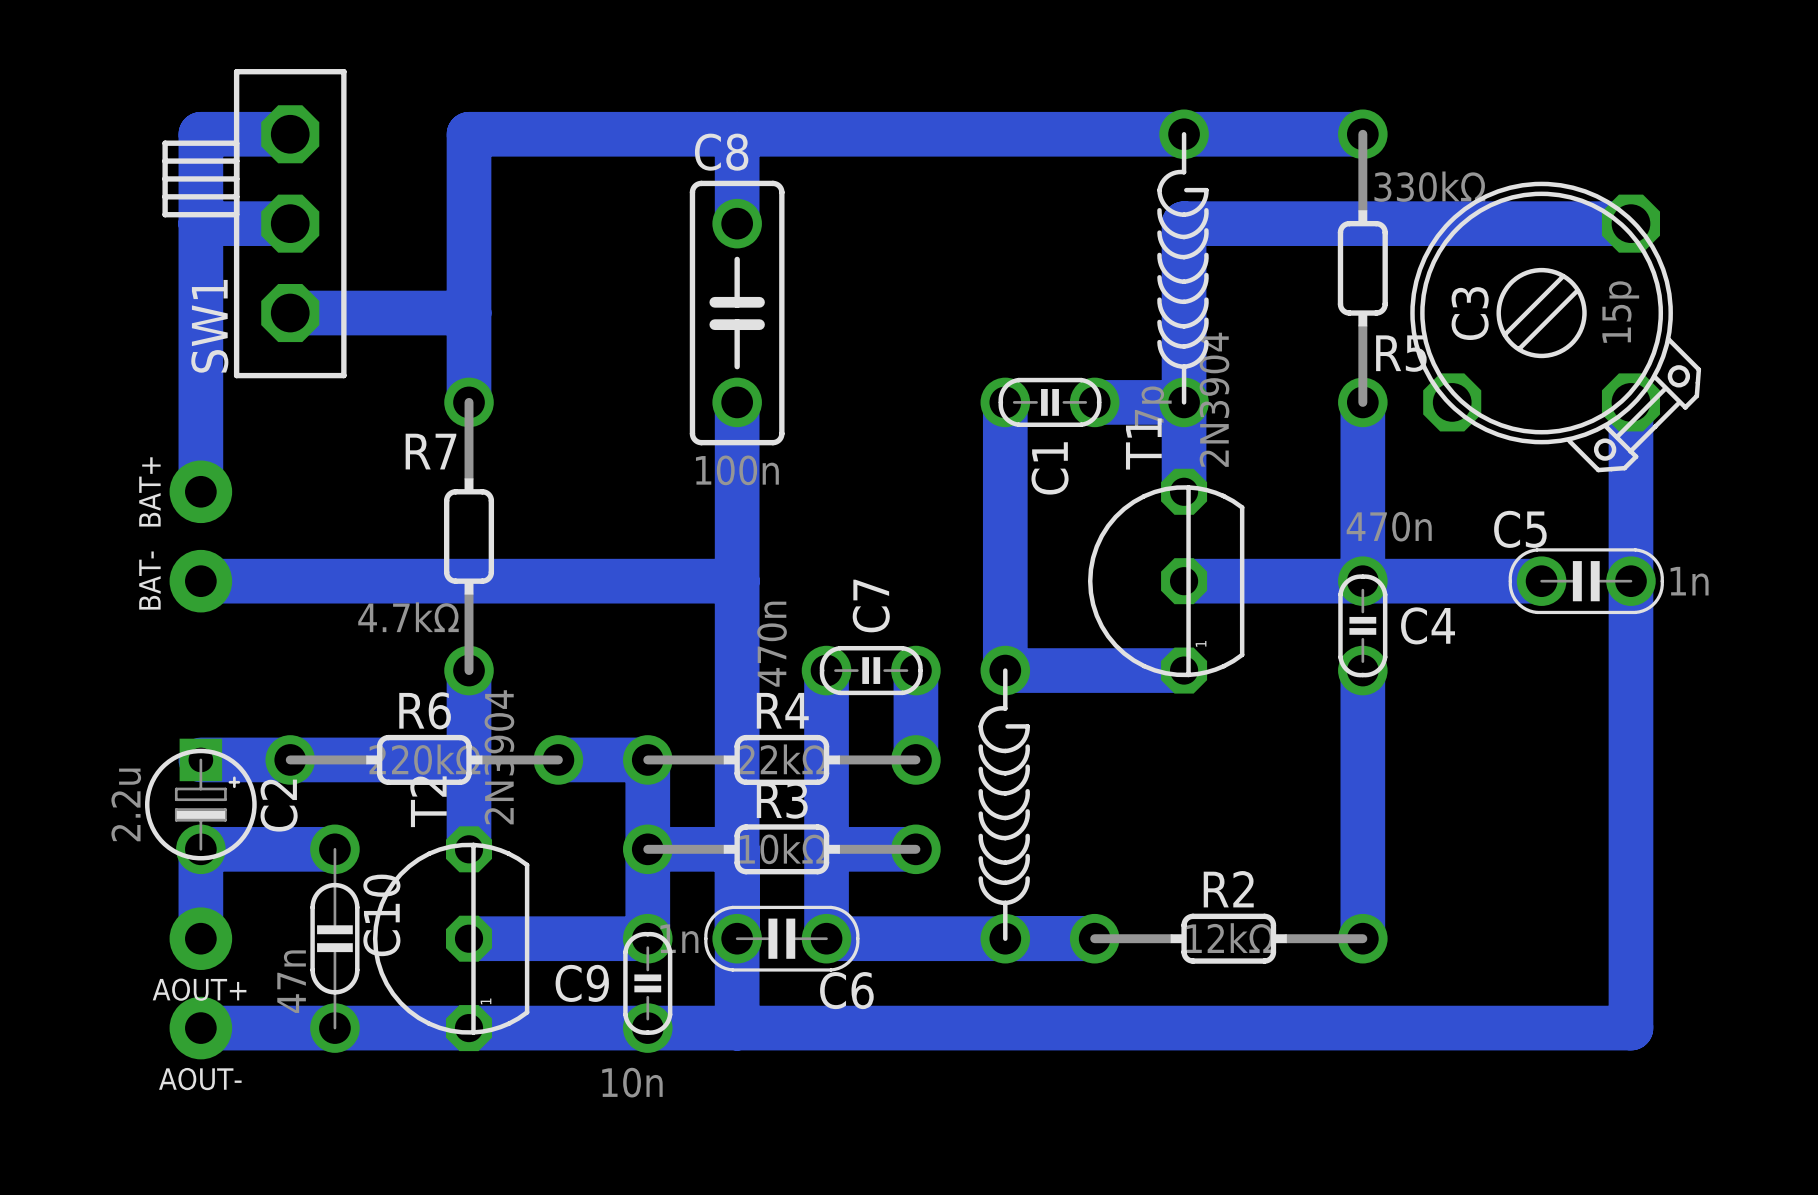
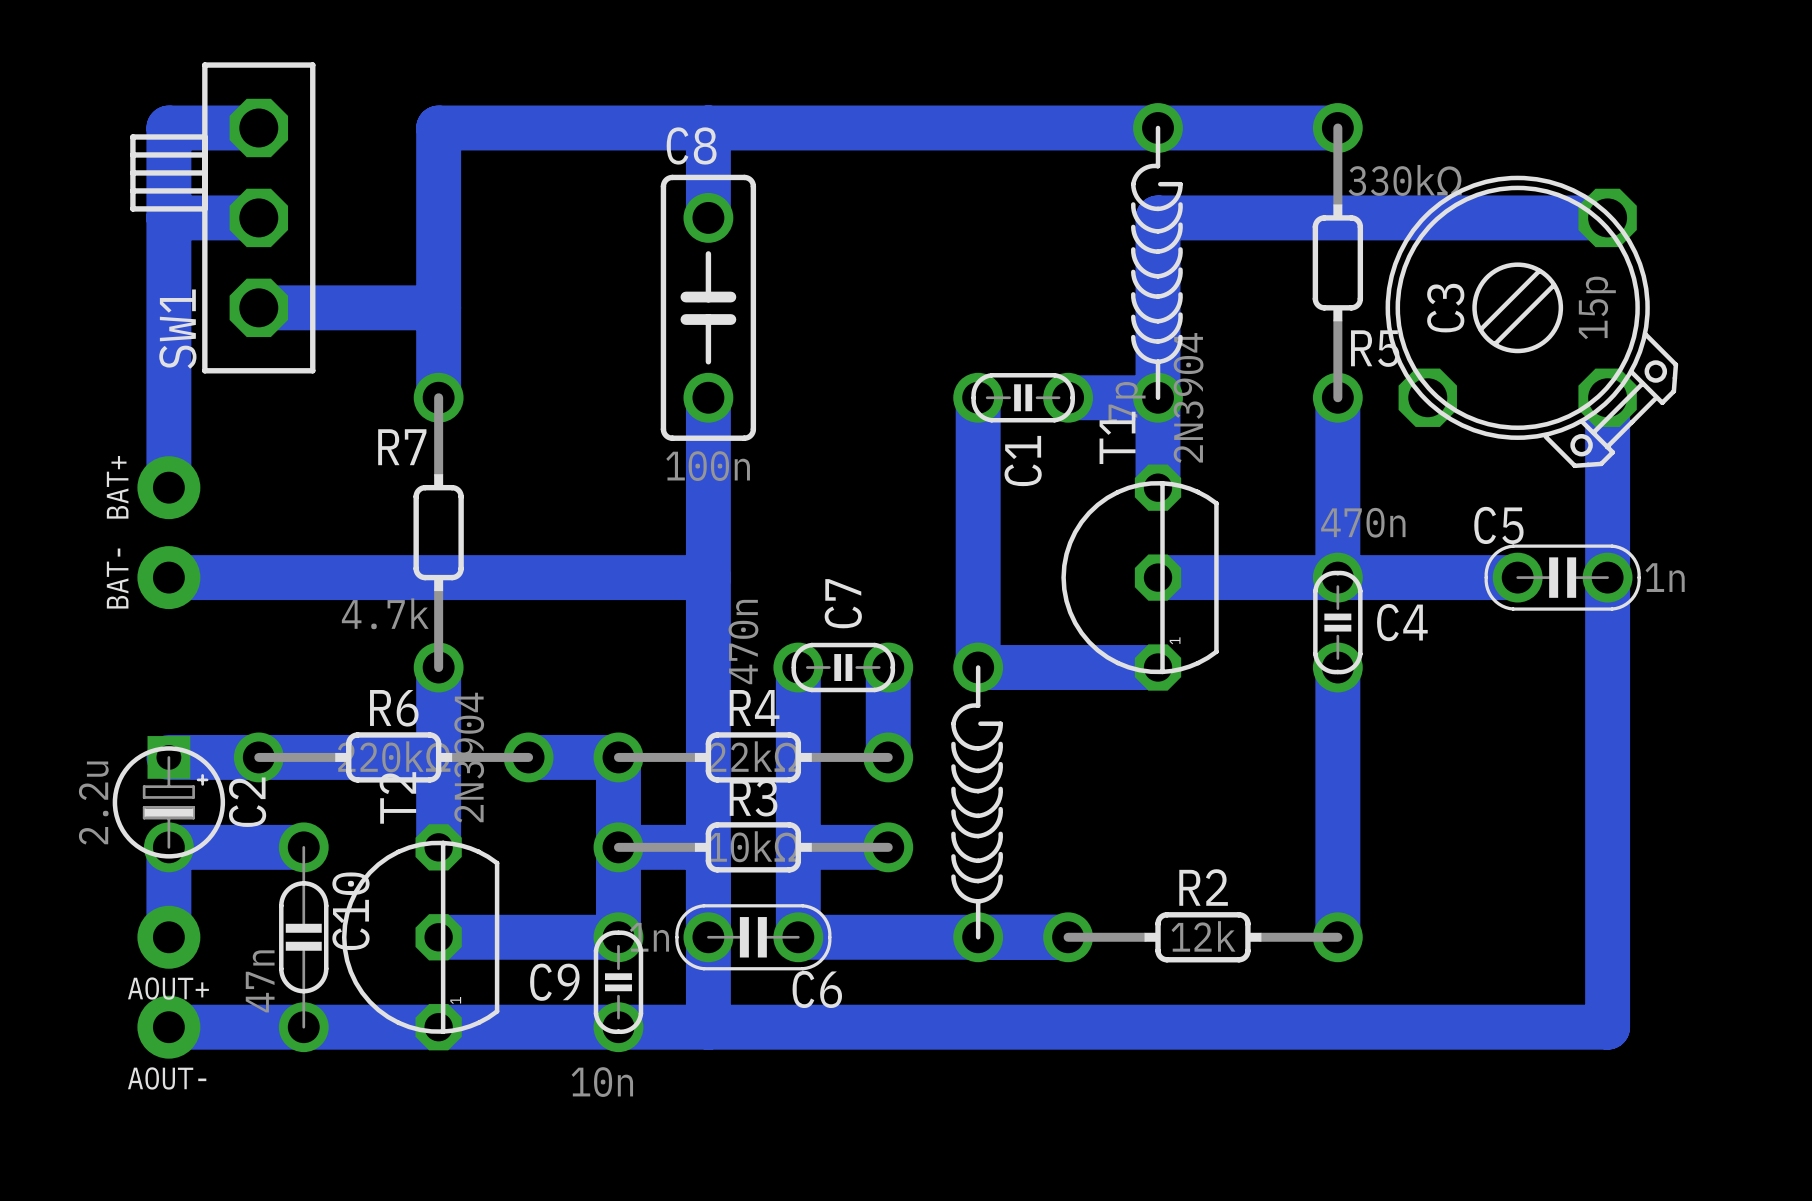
R7 value: 4.7kΩ (408, 617) -> 4.7k (385, 613)
R2 value: 12kΩ (1230, 938) -> 12k (1203, 936)

